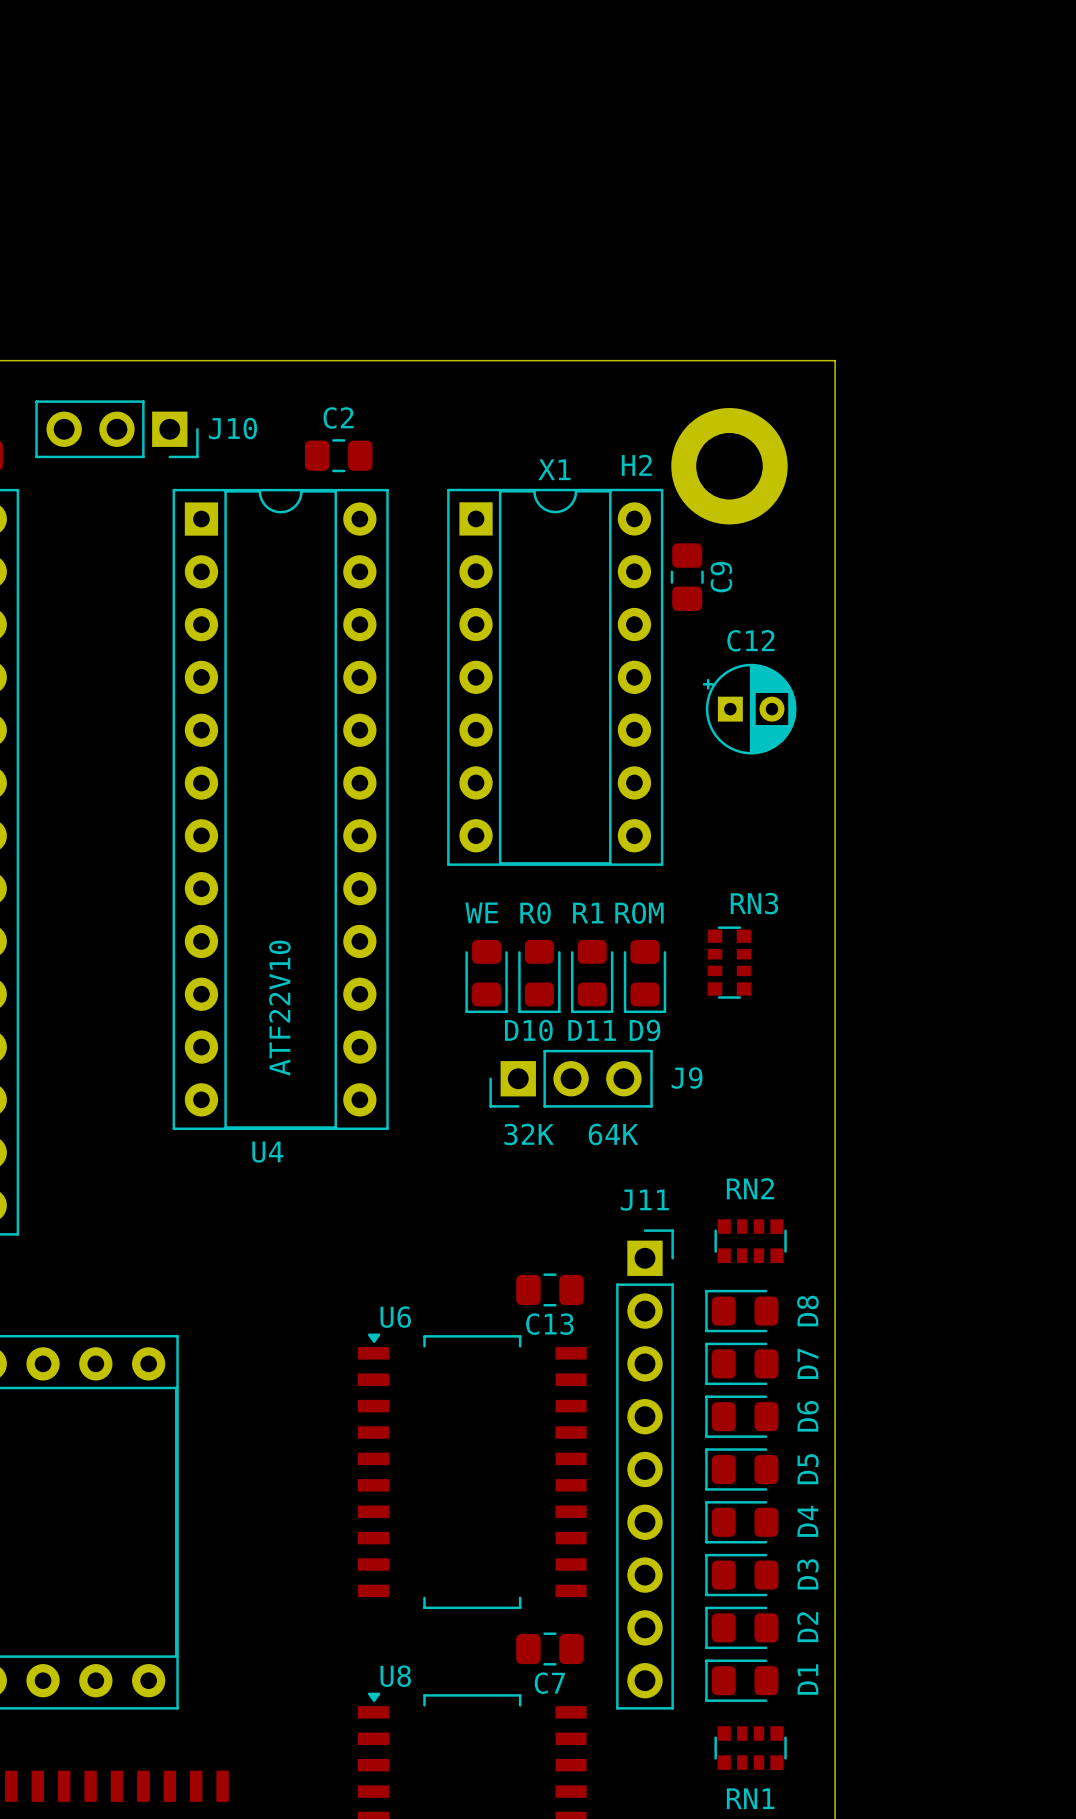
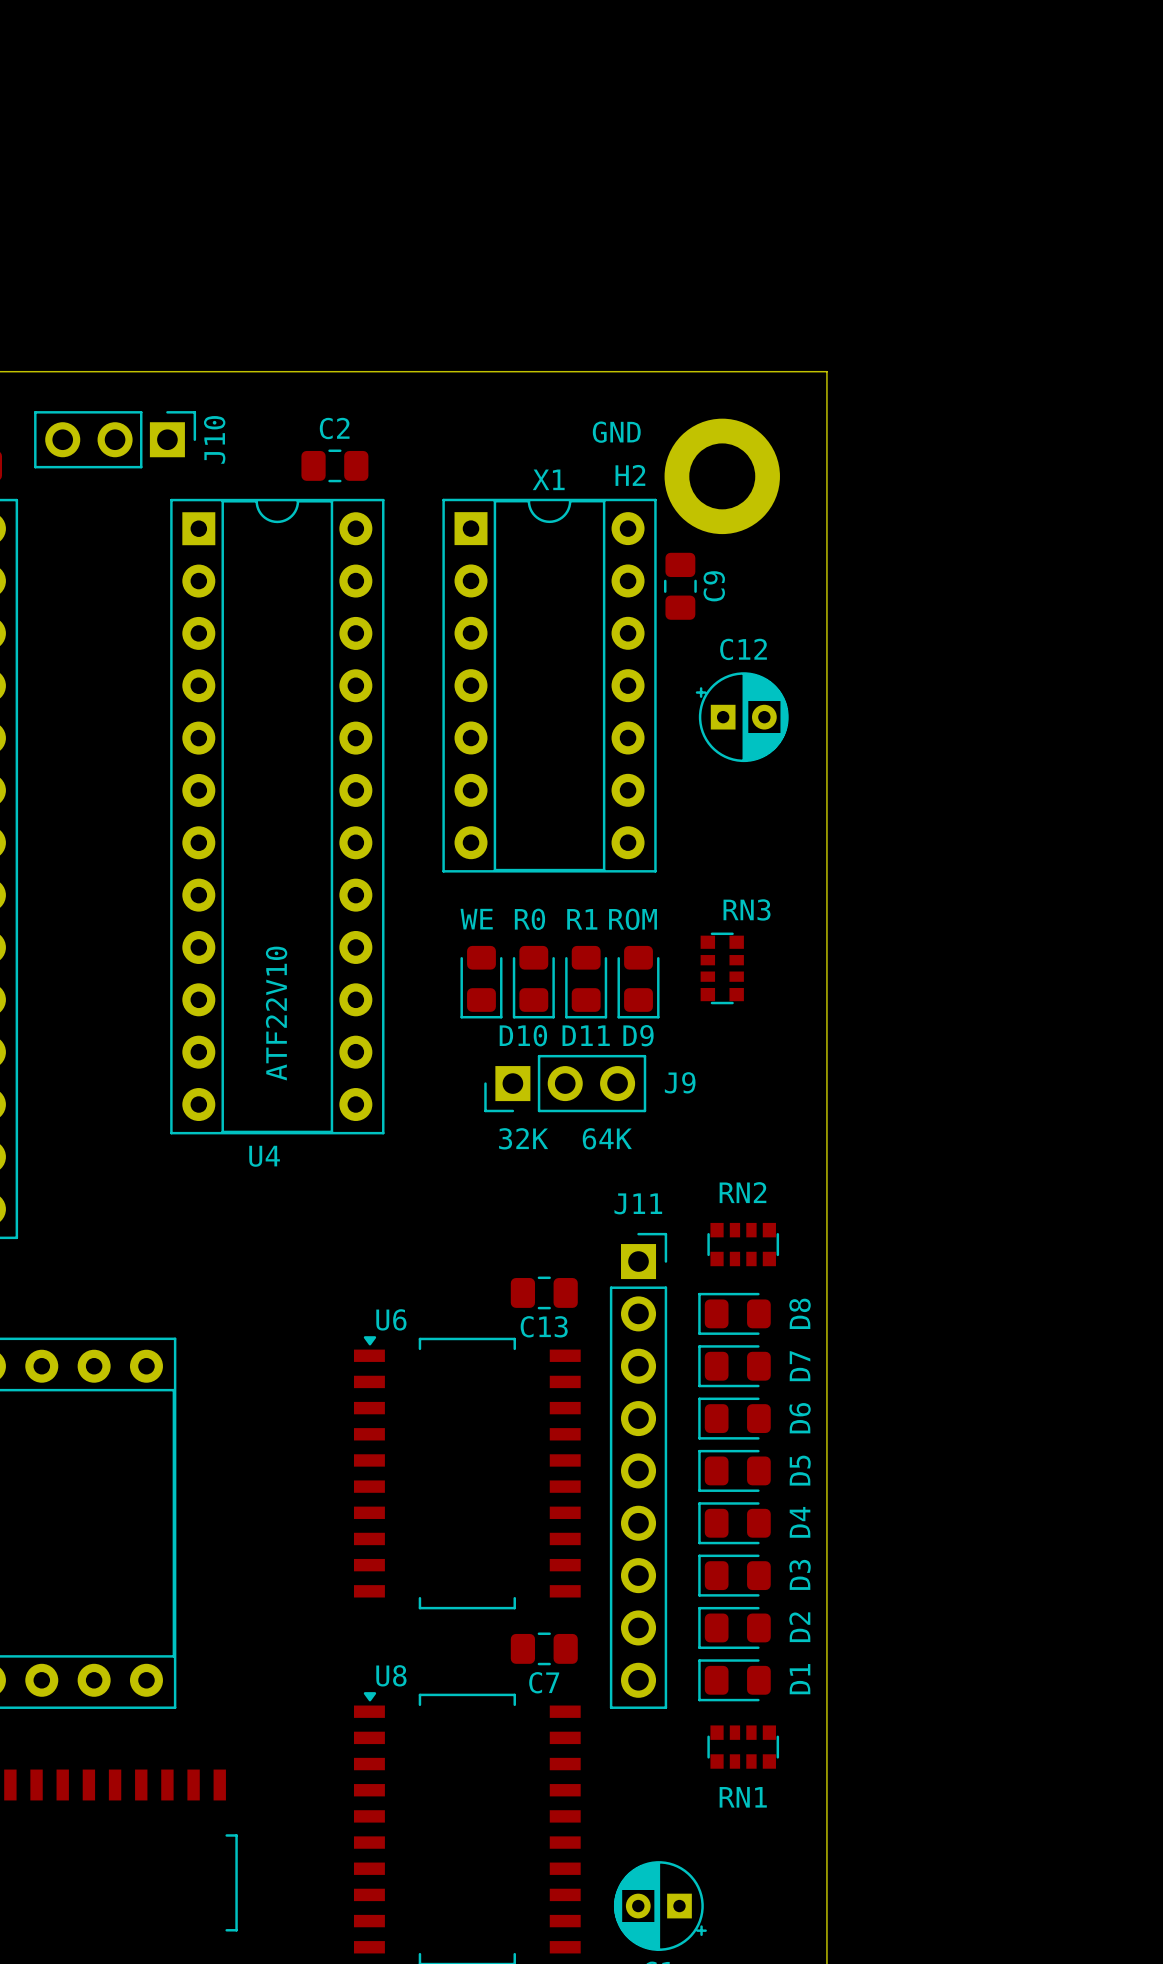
J10 footprint: [35, 400, 199, 459] -> [34, 411, 197, 469]
text: none -> GND (616, 432)

